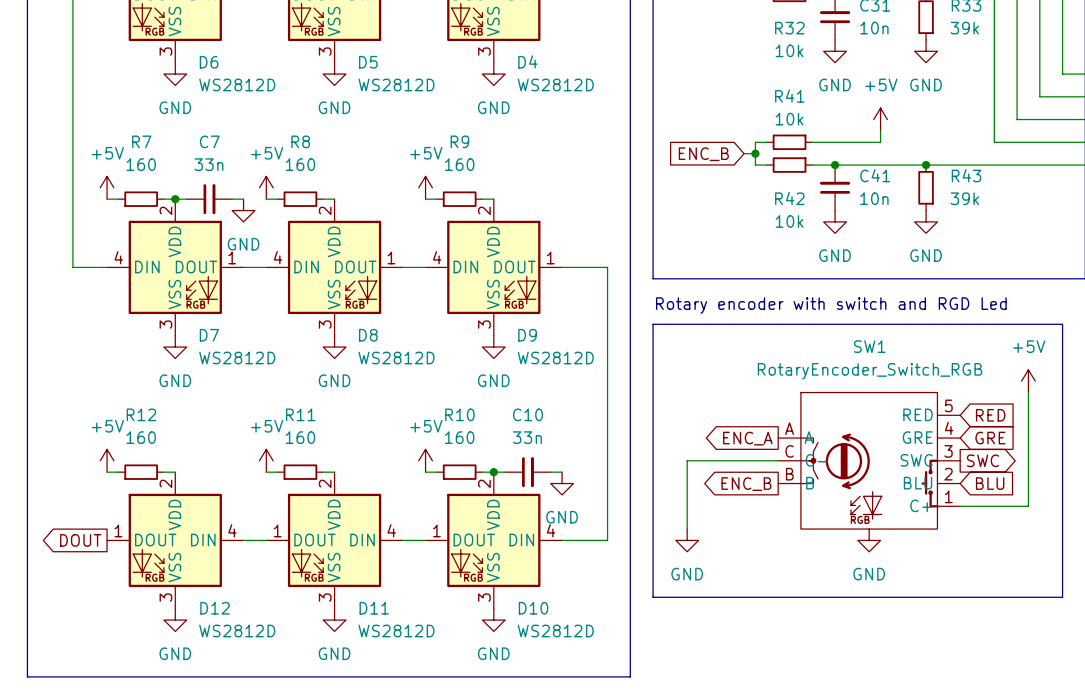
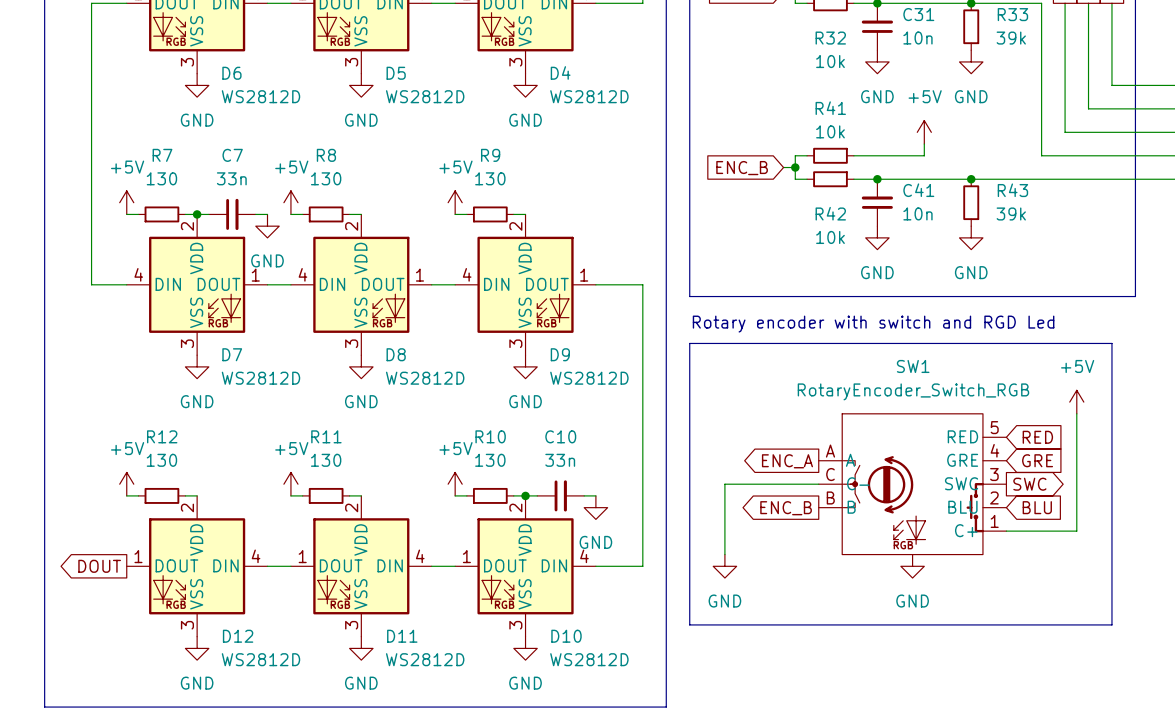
R7 value: 160 (141, 164) -> 130 (161, 178)
R8 value: 160 (300, 164) -> 130 (326, 178)
R9 value: 160 (459, 164) -> 130 (490, 178)
R12 value: 160 (141, 437) -> 130 (161, 460)
R11 value: 160 (300, 437) -> 130 (326, 460)
R10 value: 160 (459, 437) -> 130 (490, 460)

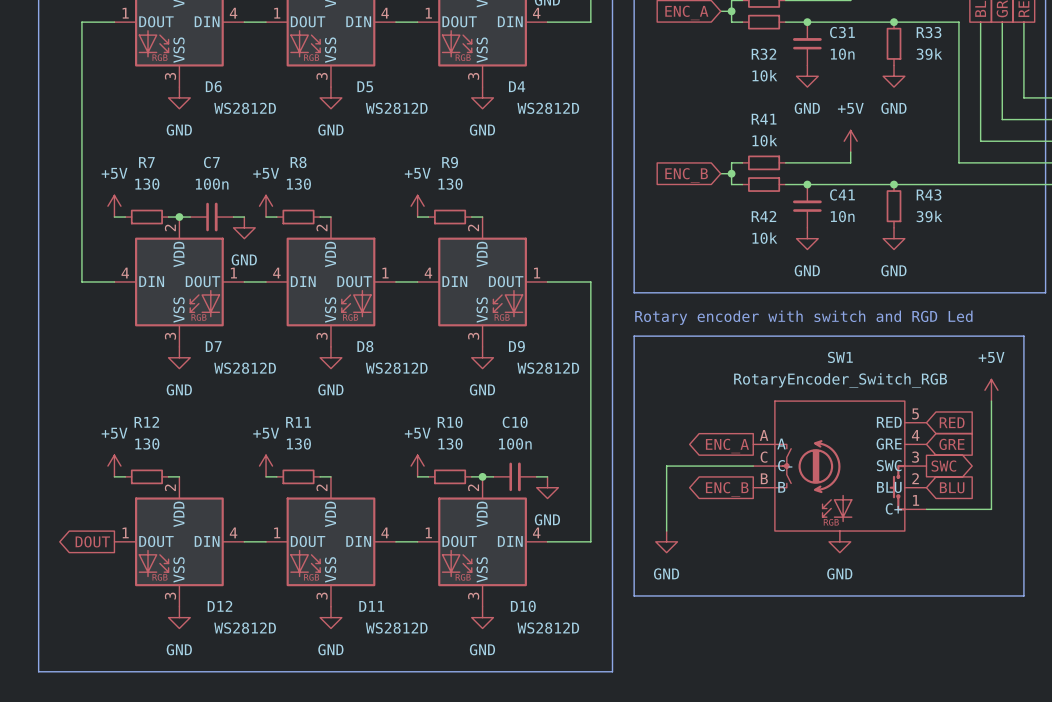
C7 value: 33n (231, 178) -> 100n (212, 184)
C10 value: 33n (560, 460) -> 100n (515, 444)

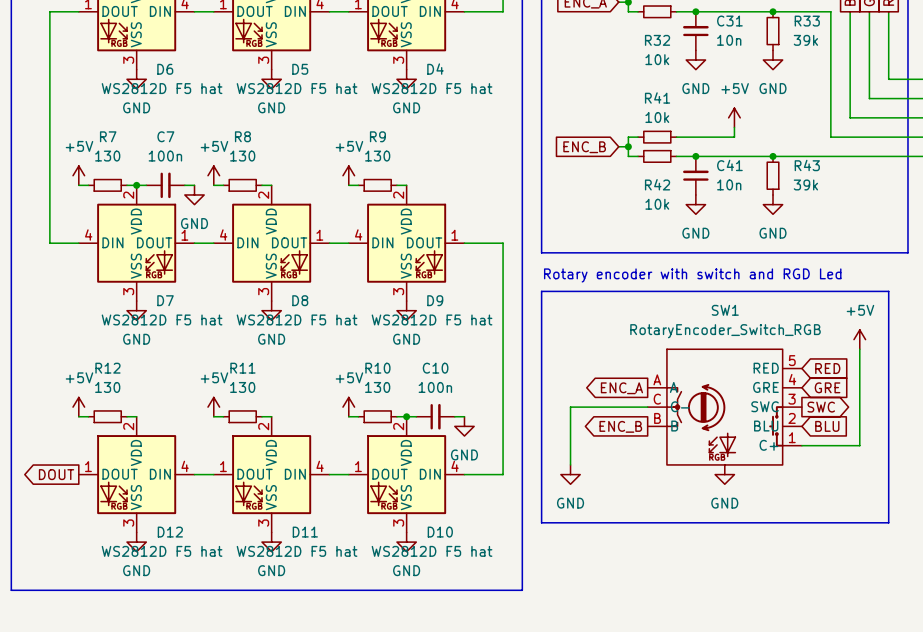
D6 value: WS2812D (245, 108) -> WS2812D F5 hat (162, 88)
D5 value: WS2812D (396, 108) -> WS2812D F5 hat (297, 88)
D4 value: WS2812D (548, 108) -> WS2812D F5 hat (432, 88)
D7 value: WS2812D (245, 368) -> WS2812D F5 hat (162, 319)
D8 value: WS2812D (396, 368) -> WS2812D F5 hat (297, 319)
D9 value: WS2812D (548, 368) -> WS2812D F5 hat (432, 319)
D12 value: WS2812D (245, 628) -> WS2812D F5 hat (162, 551)
D11 value: WS2812D (396, 628) -> WS2812D F5 hat (297, 551)
D10 value: WS2812D (548, 628) -> WS2812D F5 hat (432, 551)

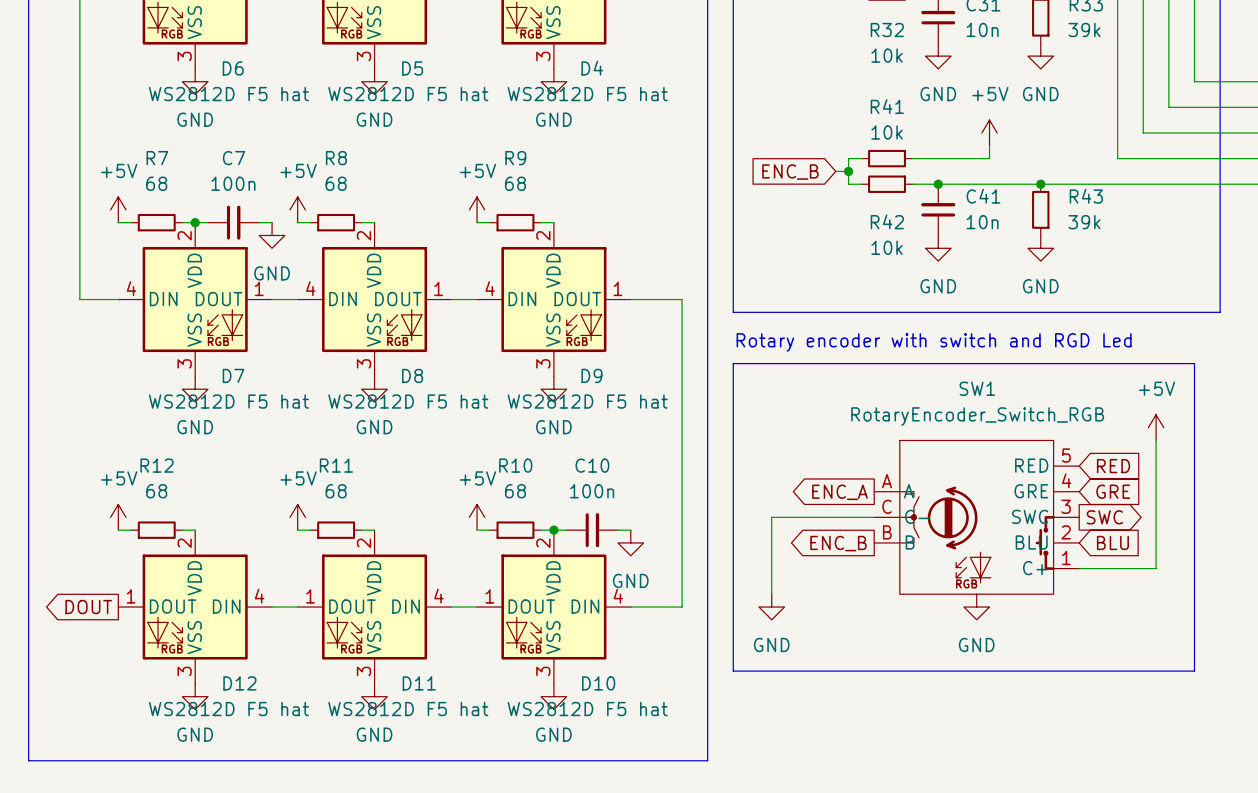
R7 value: 130 (107, 156) -> 68 (156, 183)
R8 value: 130 (242, 156) -> 68 (336, 183)
R9 value: 130 (377, 156) -> 68 (515, 183)
R12 value: 130 (107, 387) -> 68 (156, 491)
R11 value: 130 (242, 387) -> 68 (336, 491)
R10 value: 130 (377, 387) -> 68 (515, 491)

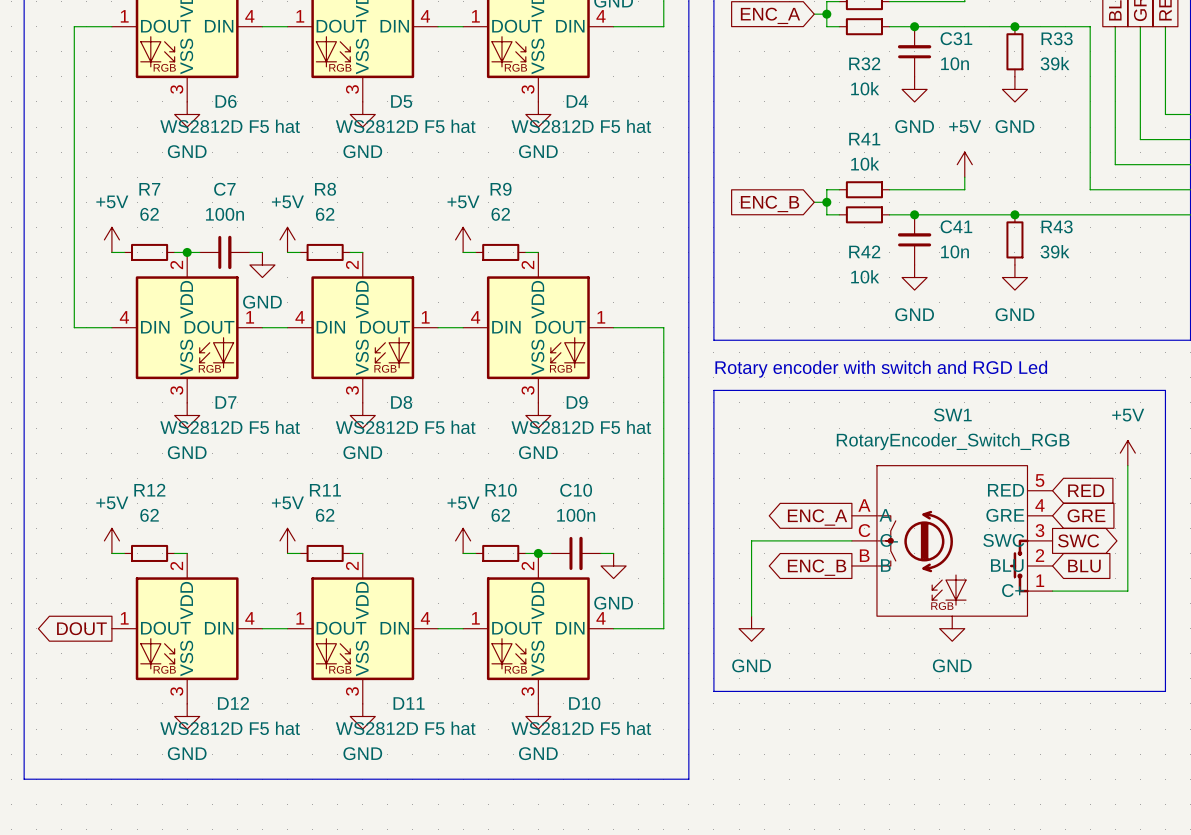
R7 value: 68 (156, 183) -> 62 (149, 214)
R8 value: 68 (336, 183) -> 62 (325, 214)
R9 value: 68 (515, 183) -> 62 (500, 214)
R12 value: 68 (156, 491) -> 62 (149, 515)
R11 value: 68 (336, 491) -> 62 (325, 515)
R10 value: 68 (515, 491) -> 62 (500, 515)

